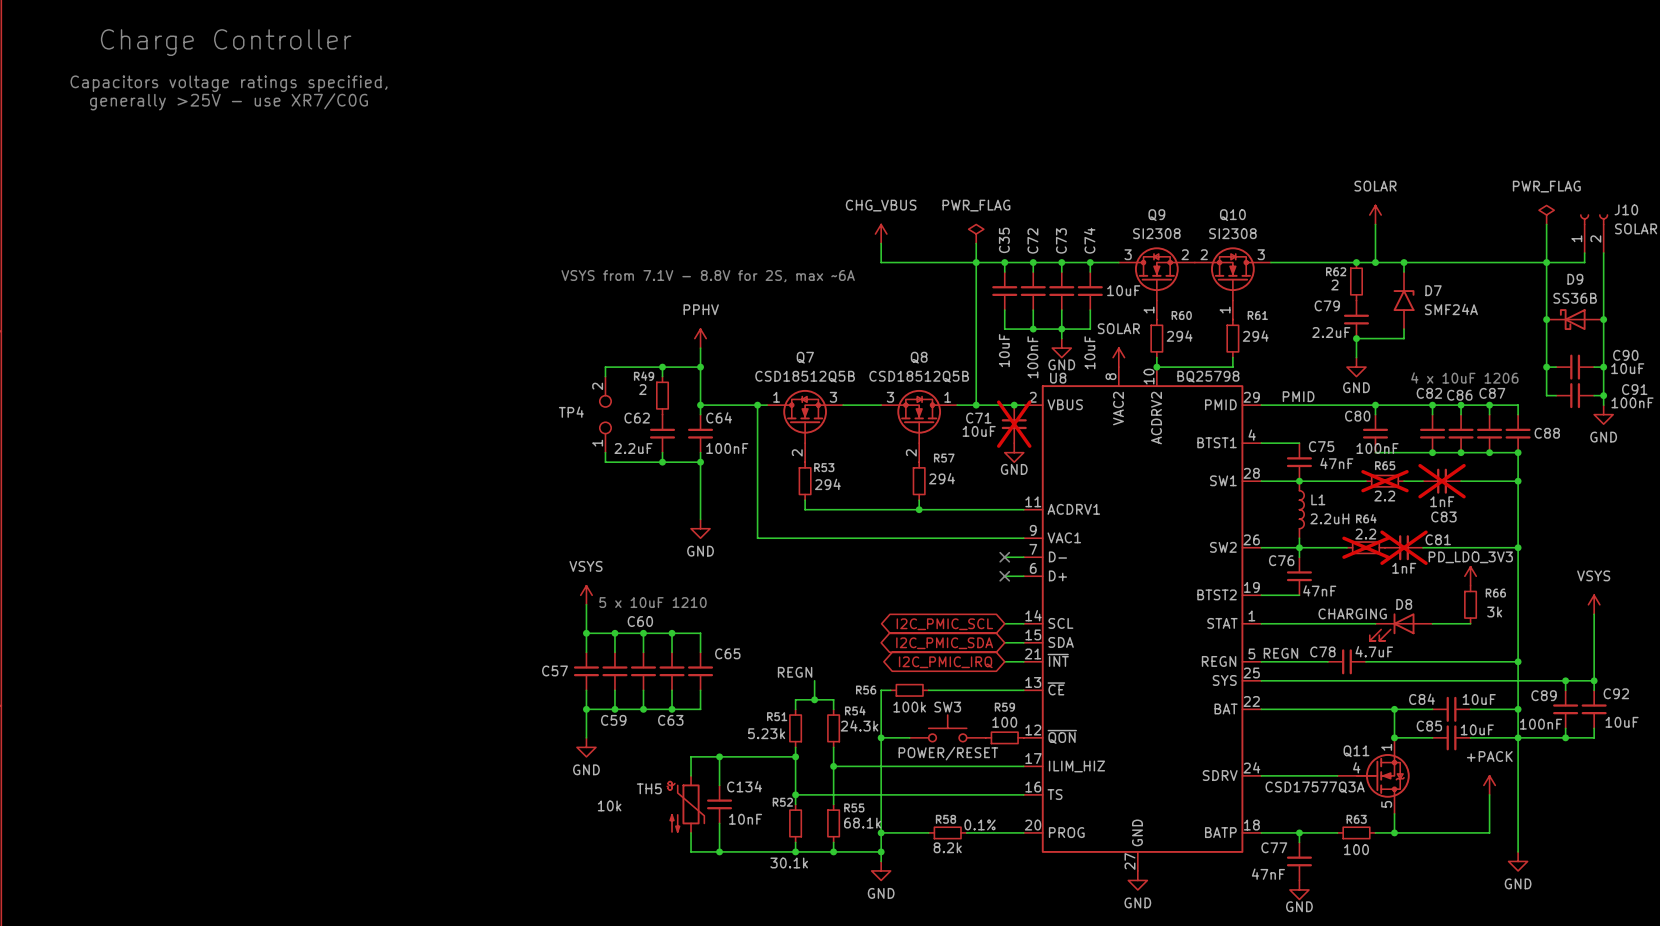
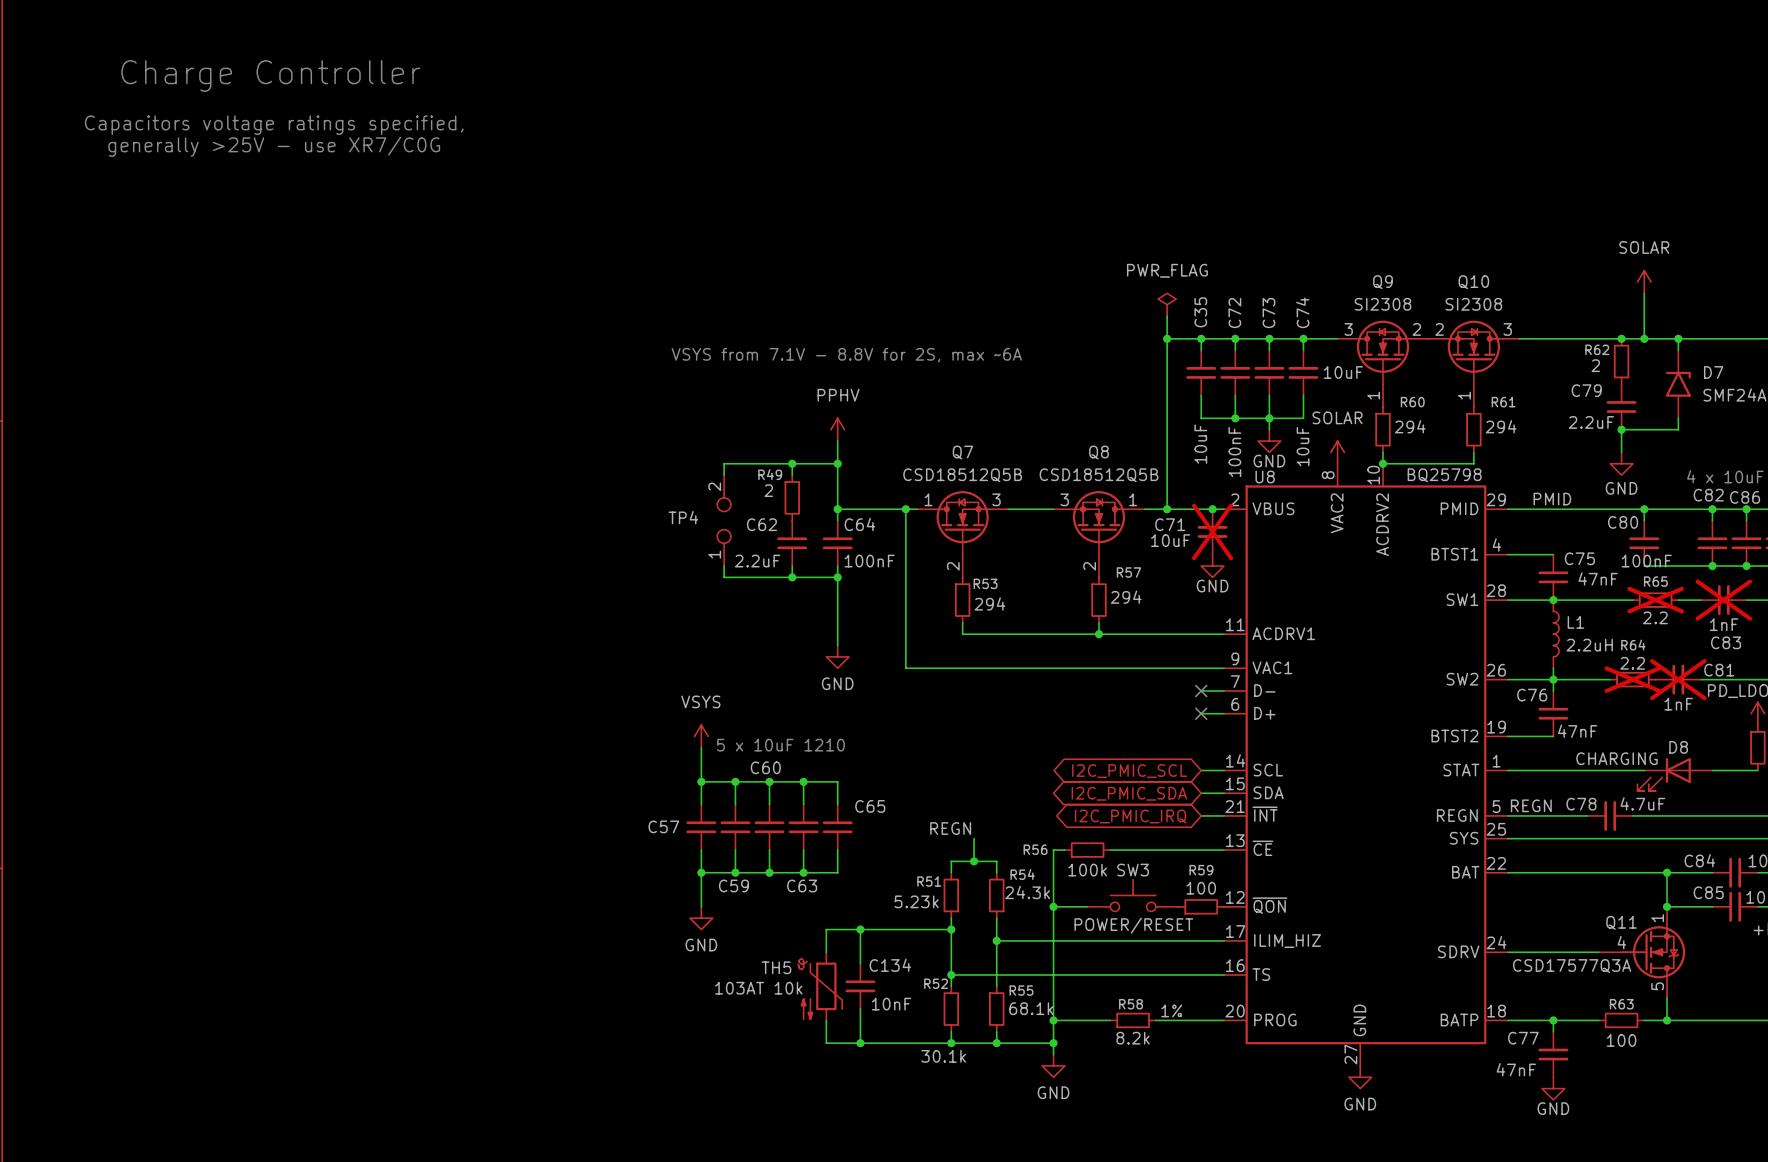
power symbol: CHG_VBUS (881, 234) -> none
wire: (881, 243) (881, 262) (976, 262) -> none
TH5 value: 10k (609, 805) -> 103AT 10k (758, 988)
R58 text: 0.1% (980, 824) -> 1% (1171, 1010)

